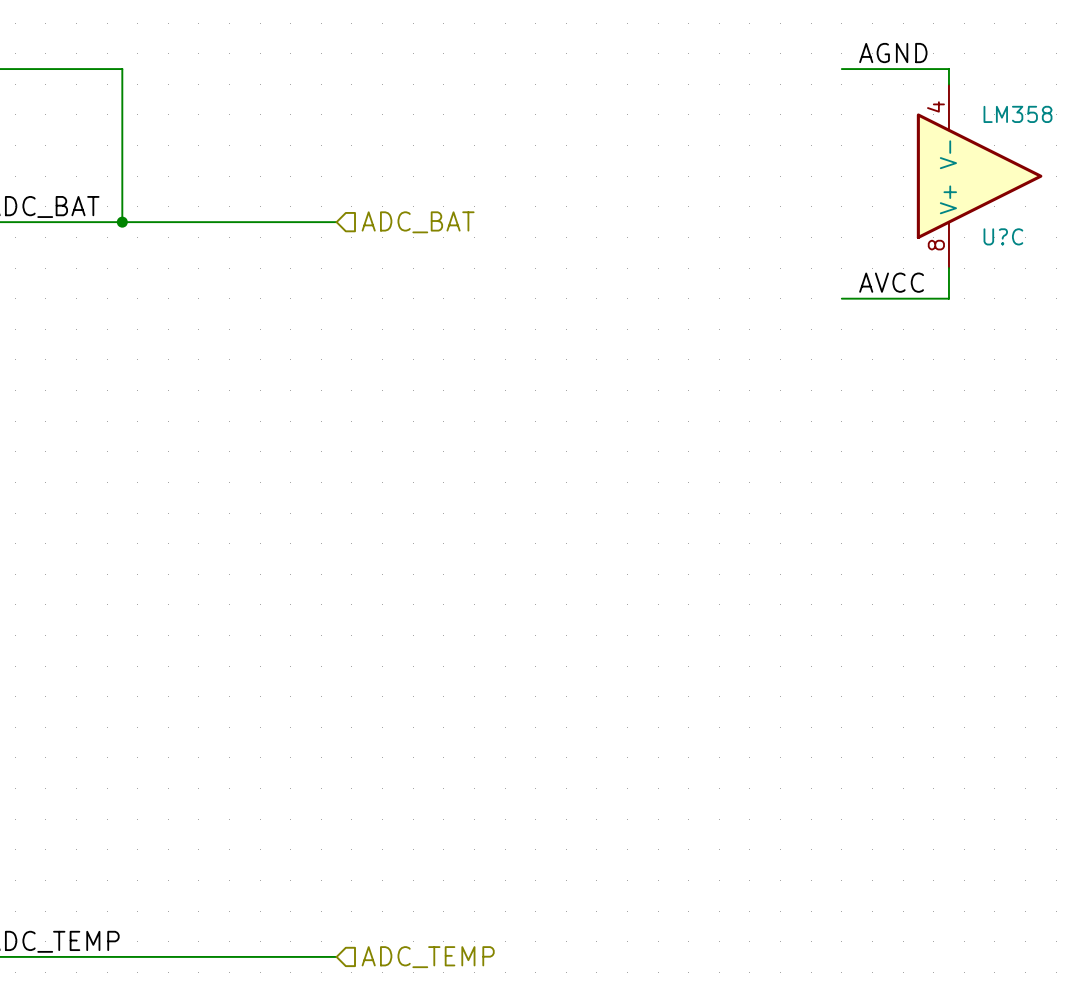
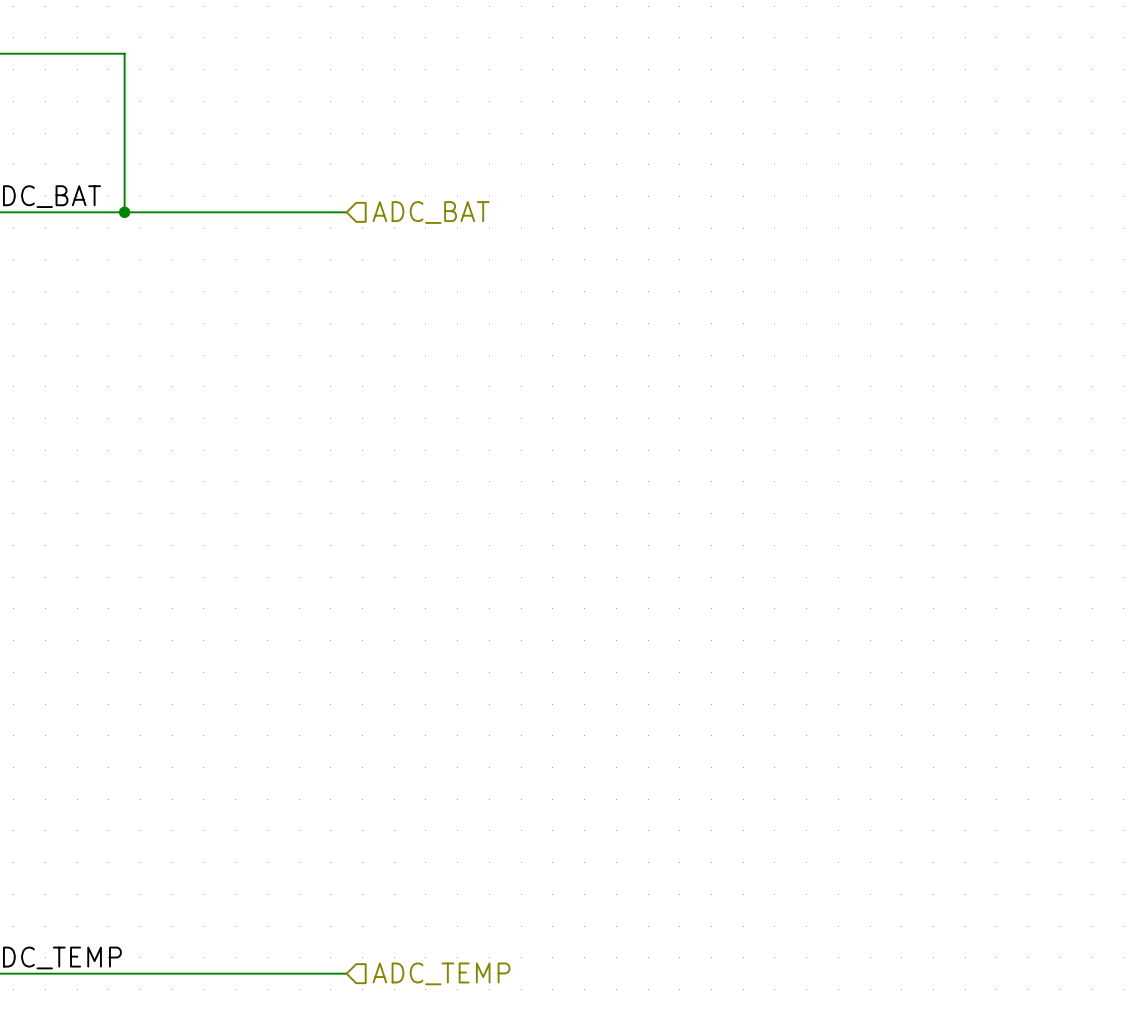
label: AGND (893, 53) -> none
wire: (841, 69) (948, 69) (948, 84) -> none
U?C: LM358 (979, 176) -> none
wire: (948, 268) (948, 298) (841, 298) -> none
label: AVCC (891, 282) -> none

